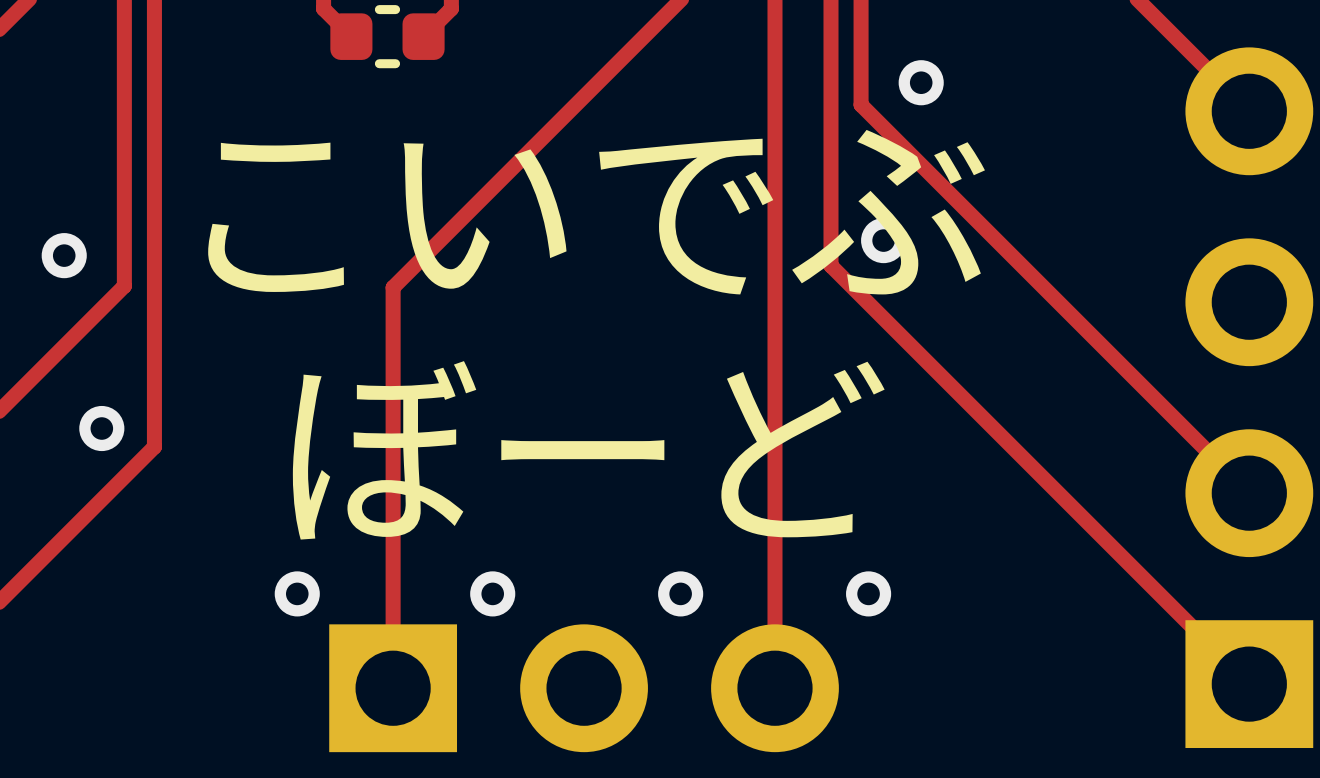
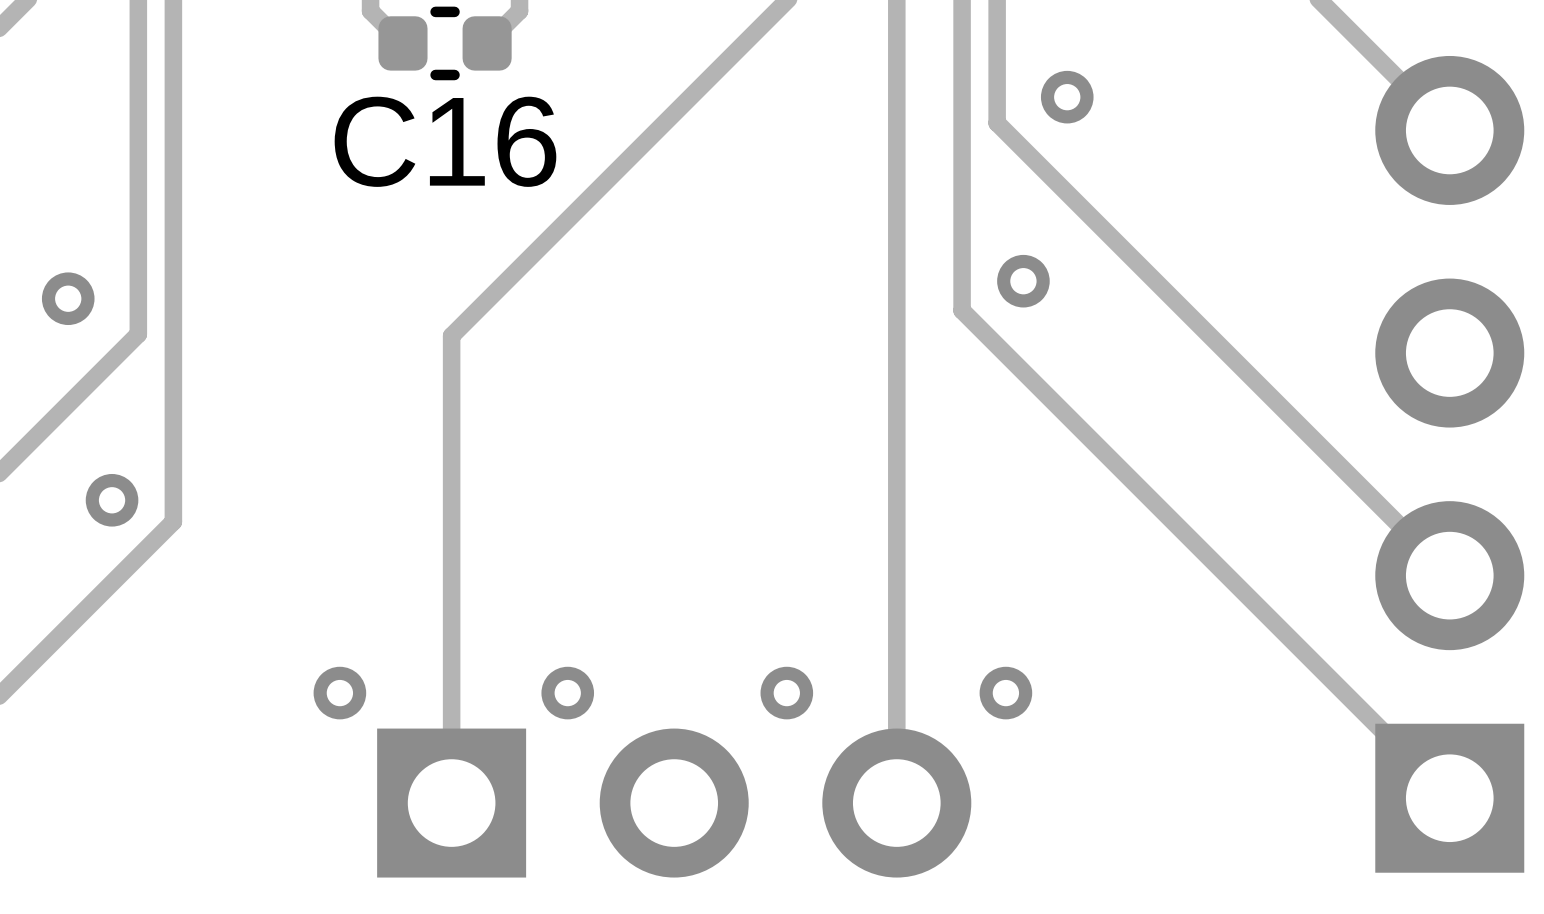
C16 name: none -> C16 (445, 141)
text: こいでぶ (596, 212) -> none
text: ぼーど (588, 450) -> none

